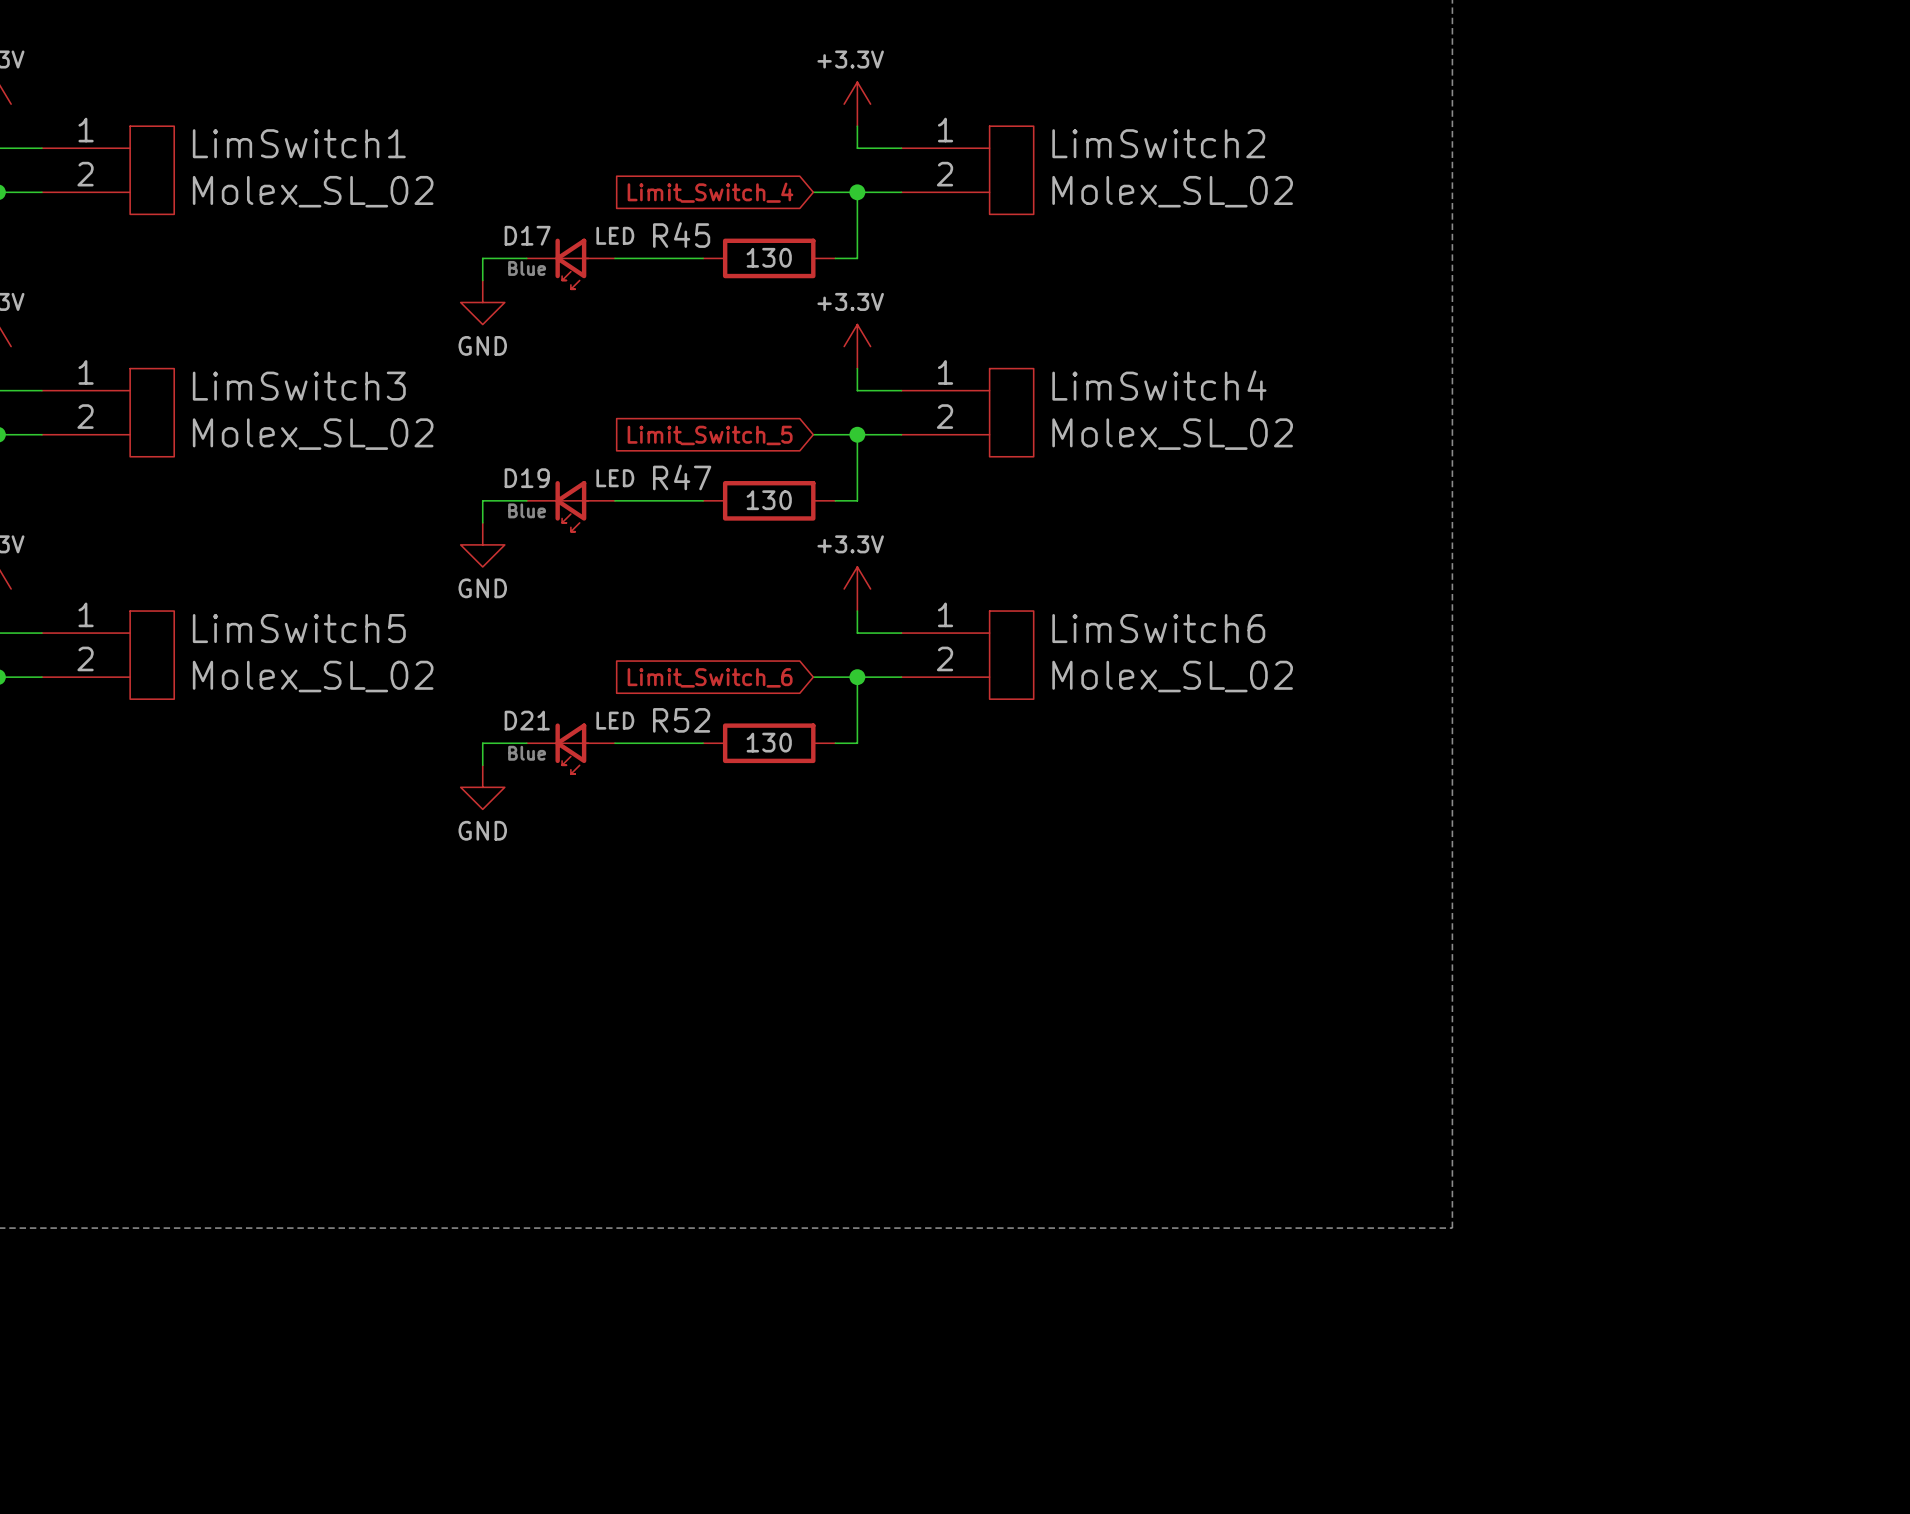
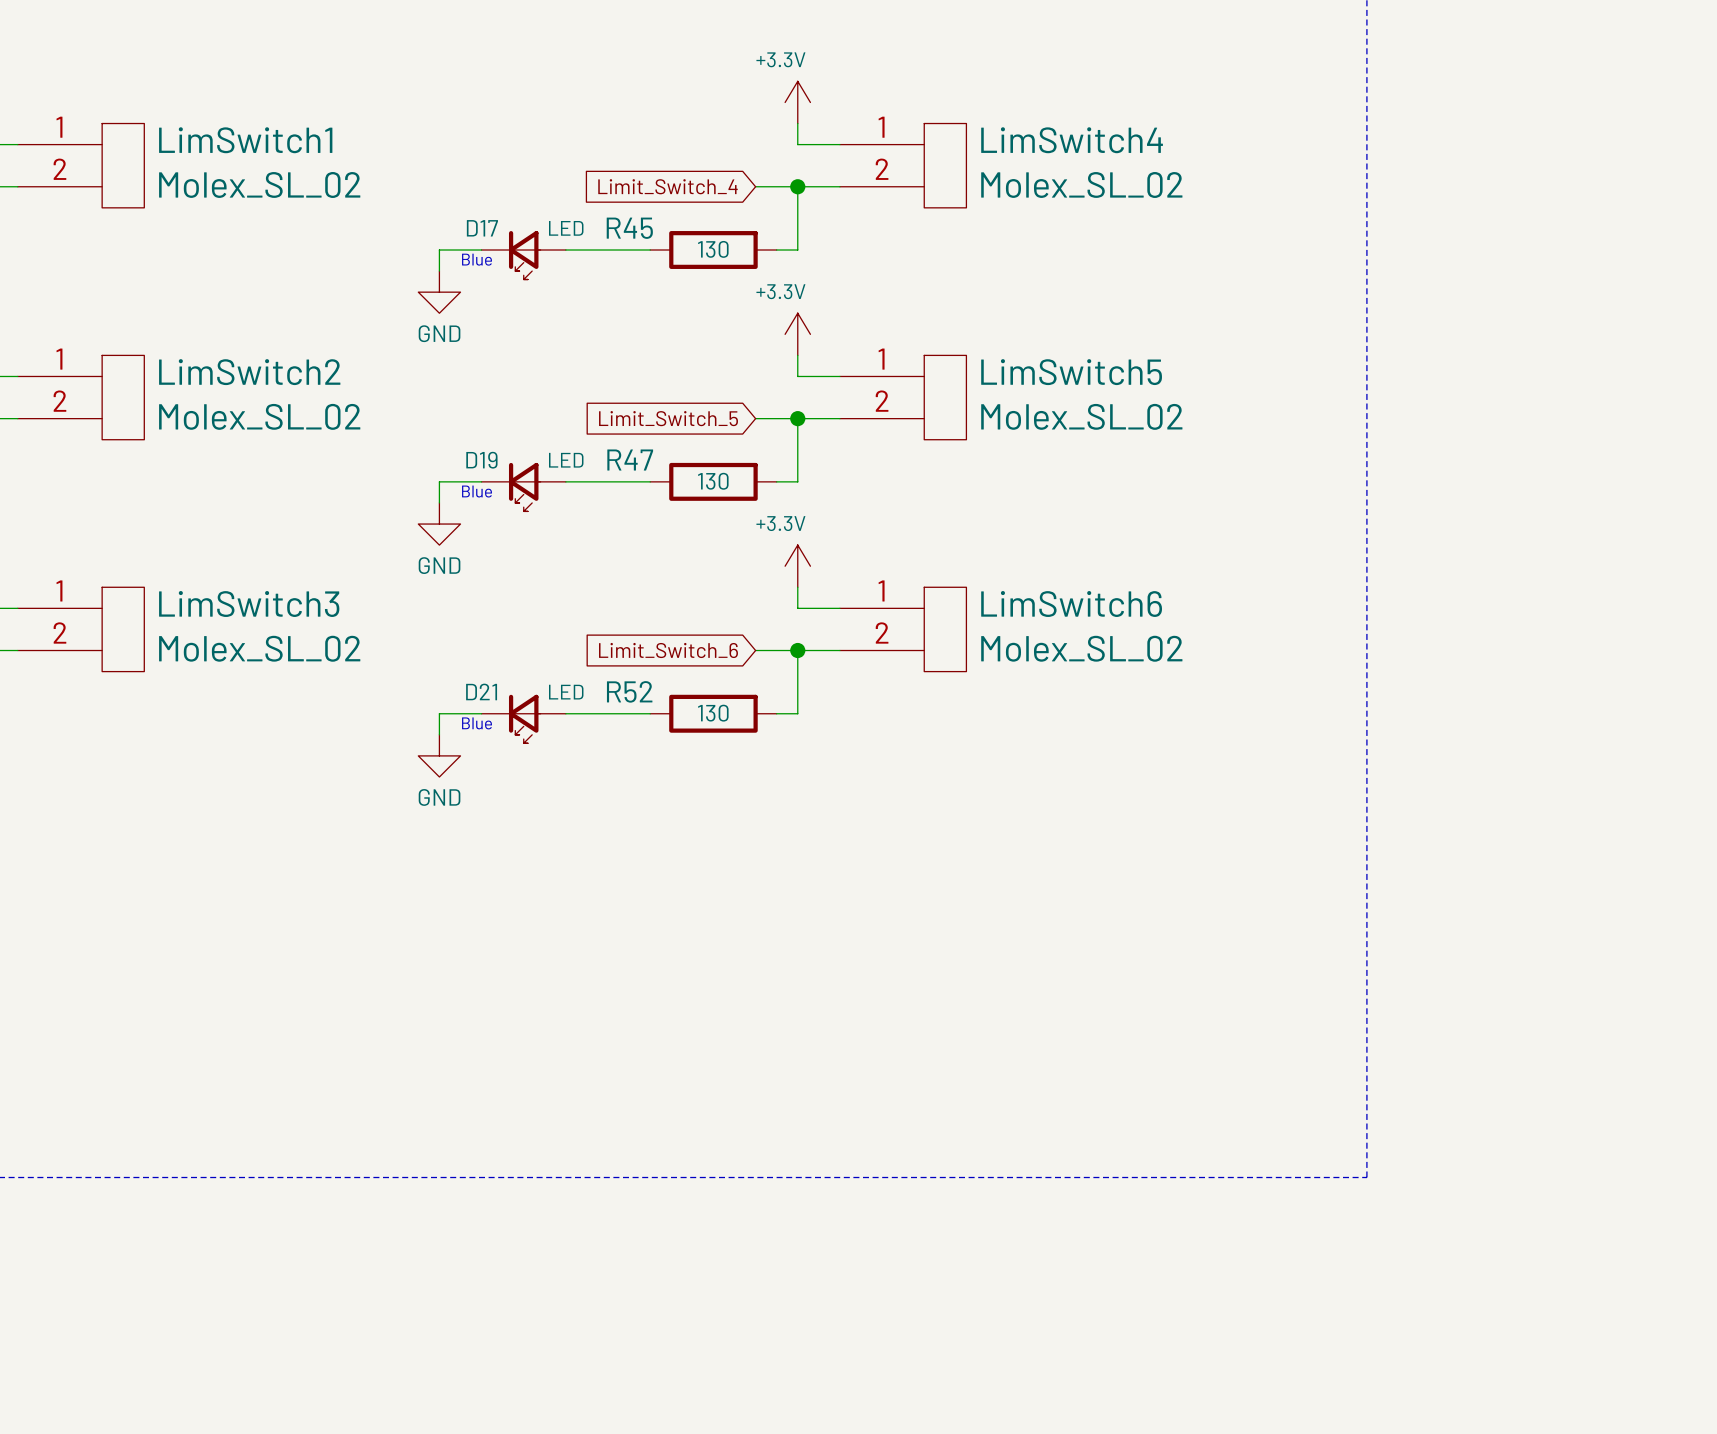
LimSwitch2 name: LimSwitch2 (1158, 143) -> LimSwitch4 (1072, 140)
LimSwitch4 name: LimSwitch4 (1159, 385) -> LimSwitch5 (1071, 372)
LimSwitch3 name: LimSwitch3 (299, 386) -> LimSwitch2 (249, 372)
LimSwitch5 name: LimSwitch5 (299, 628) -> LimSwitch3 (249, 604)

